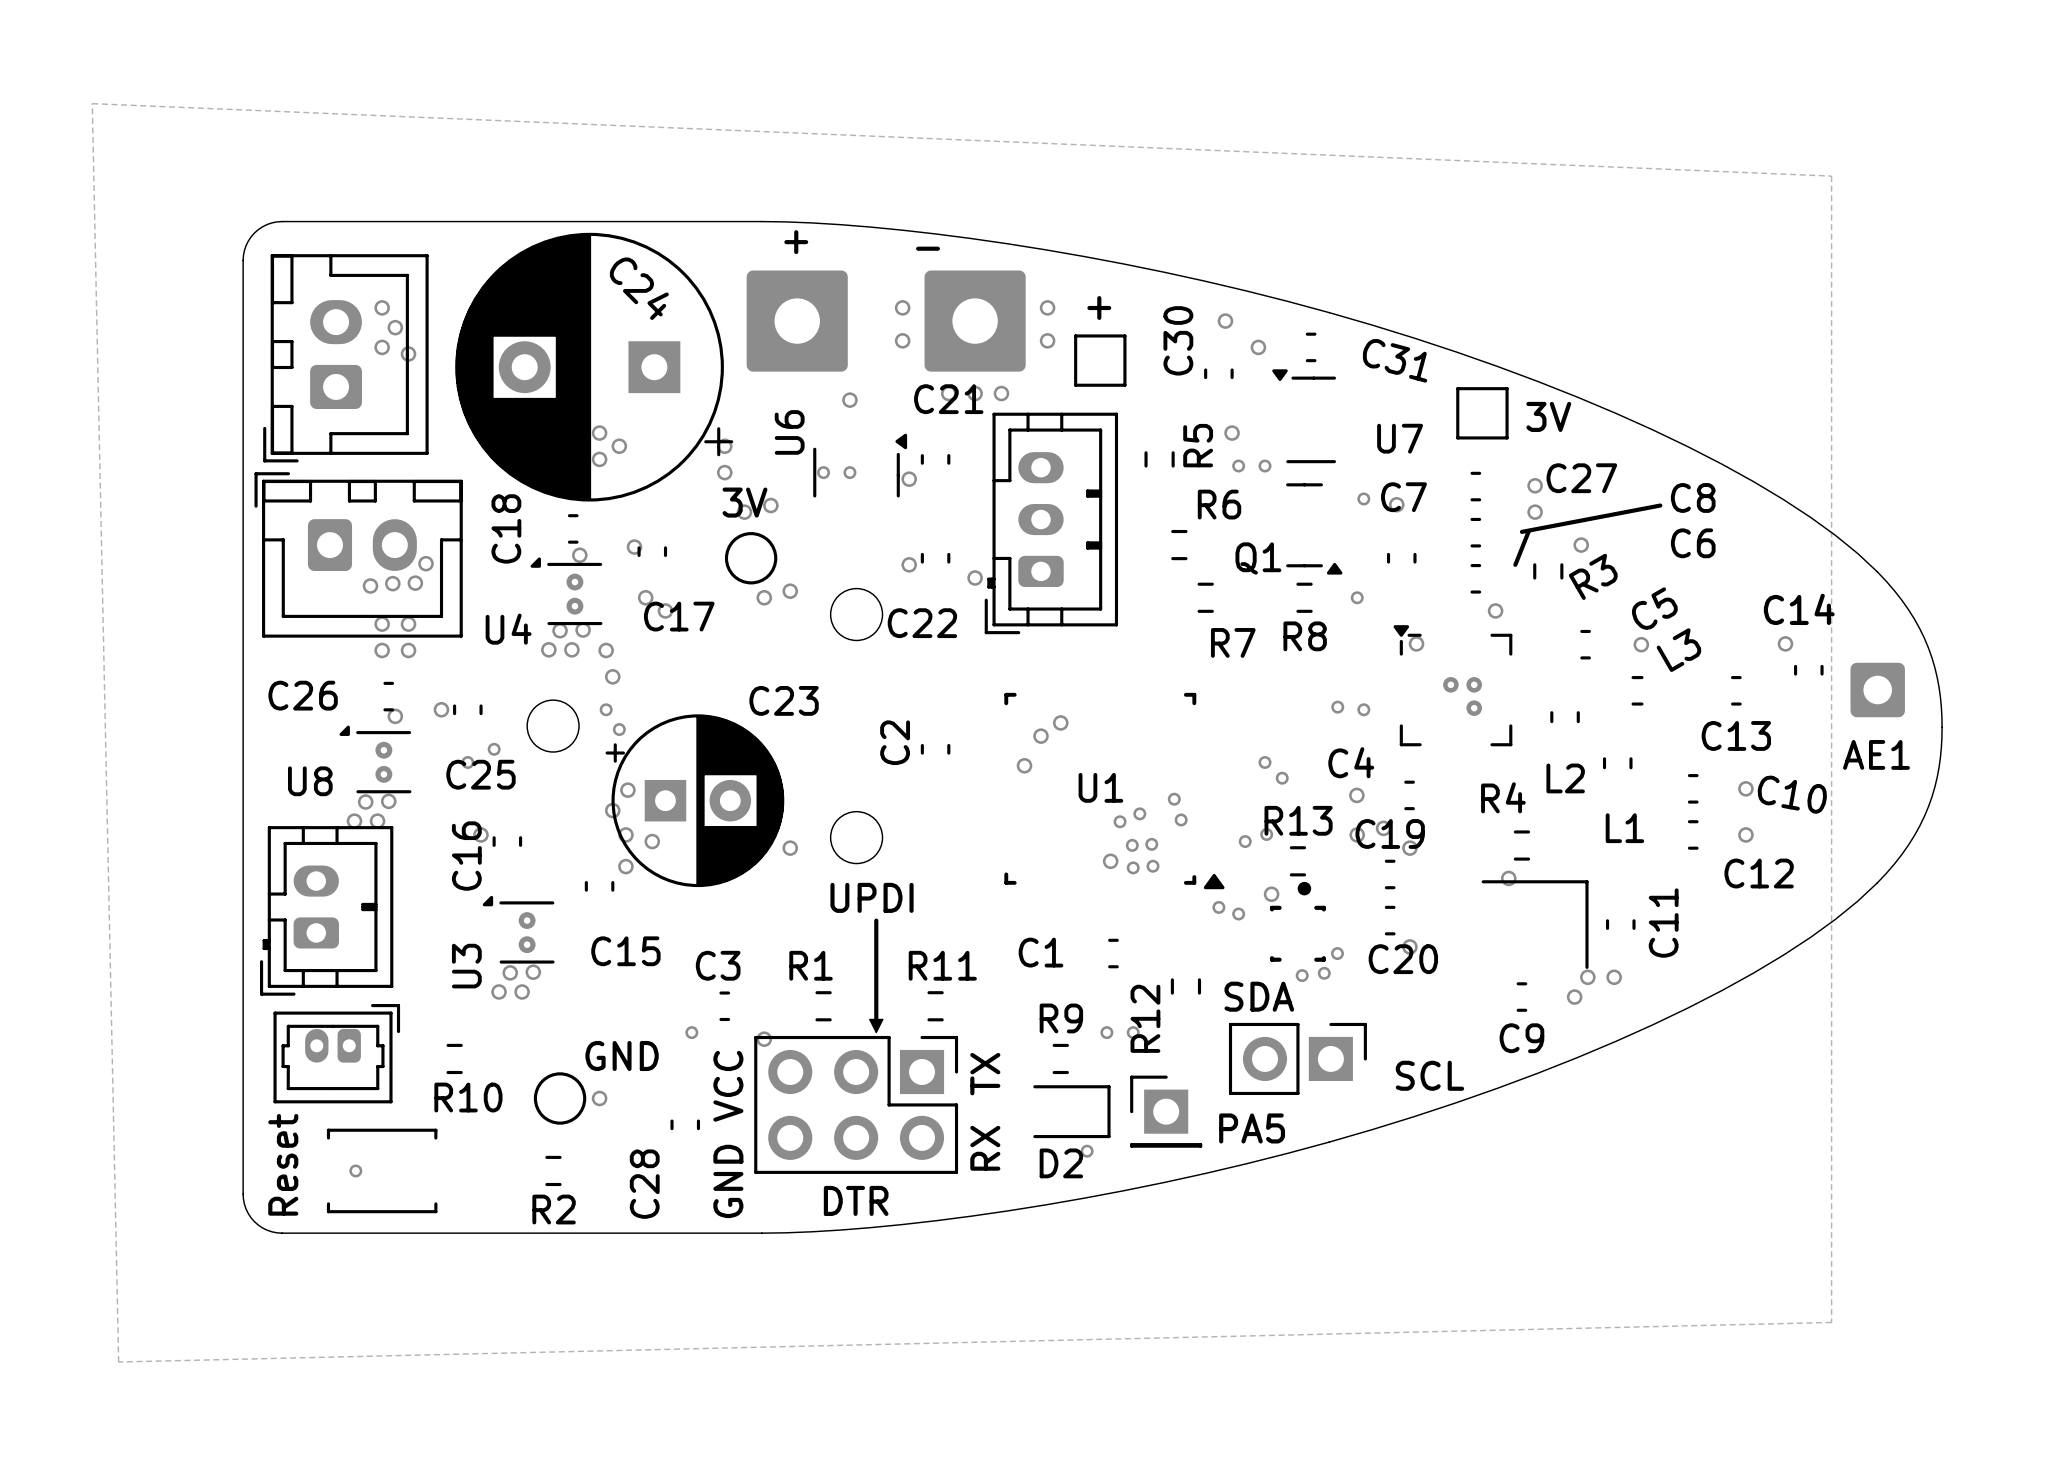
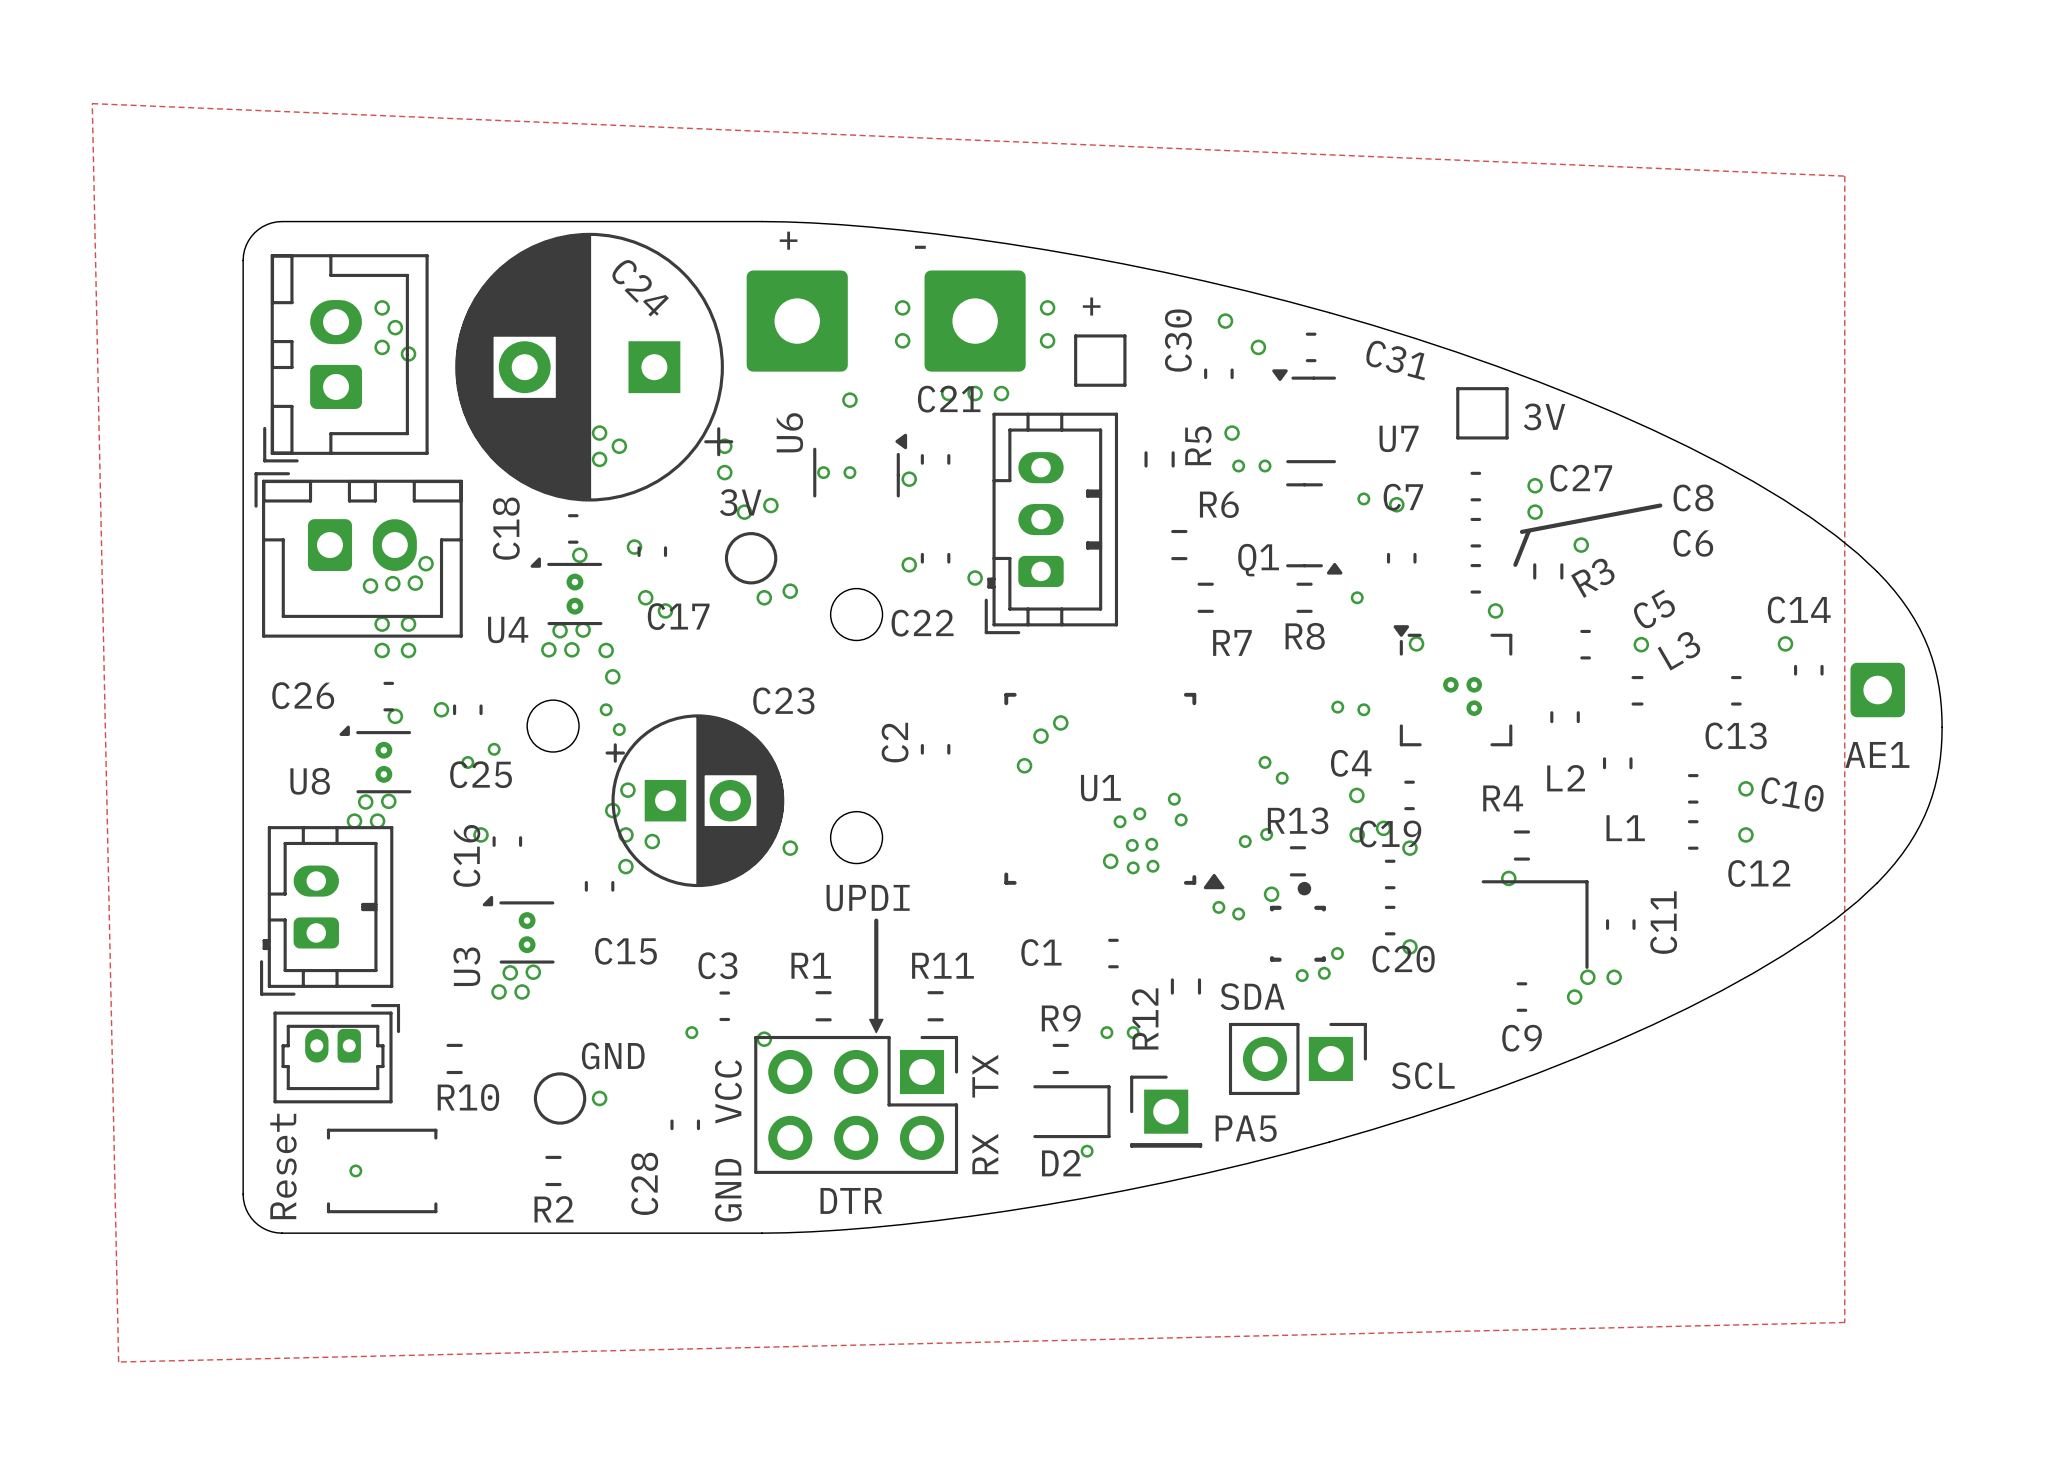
zone outline: (92, 103) (1831, 176) (1831, 1322) (118, 1362) -> (92, 103) (1844, 176) (1844, 1322) (118, 1362)

